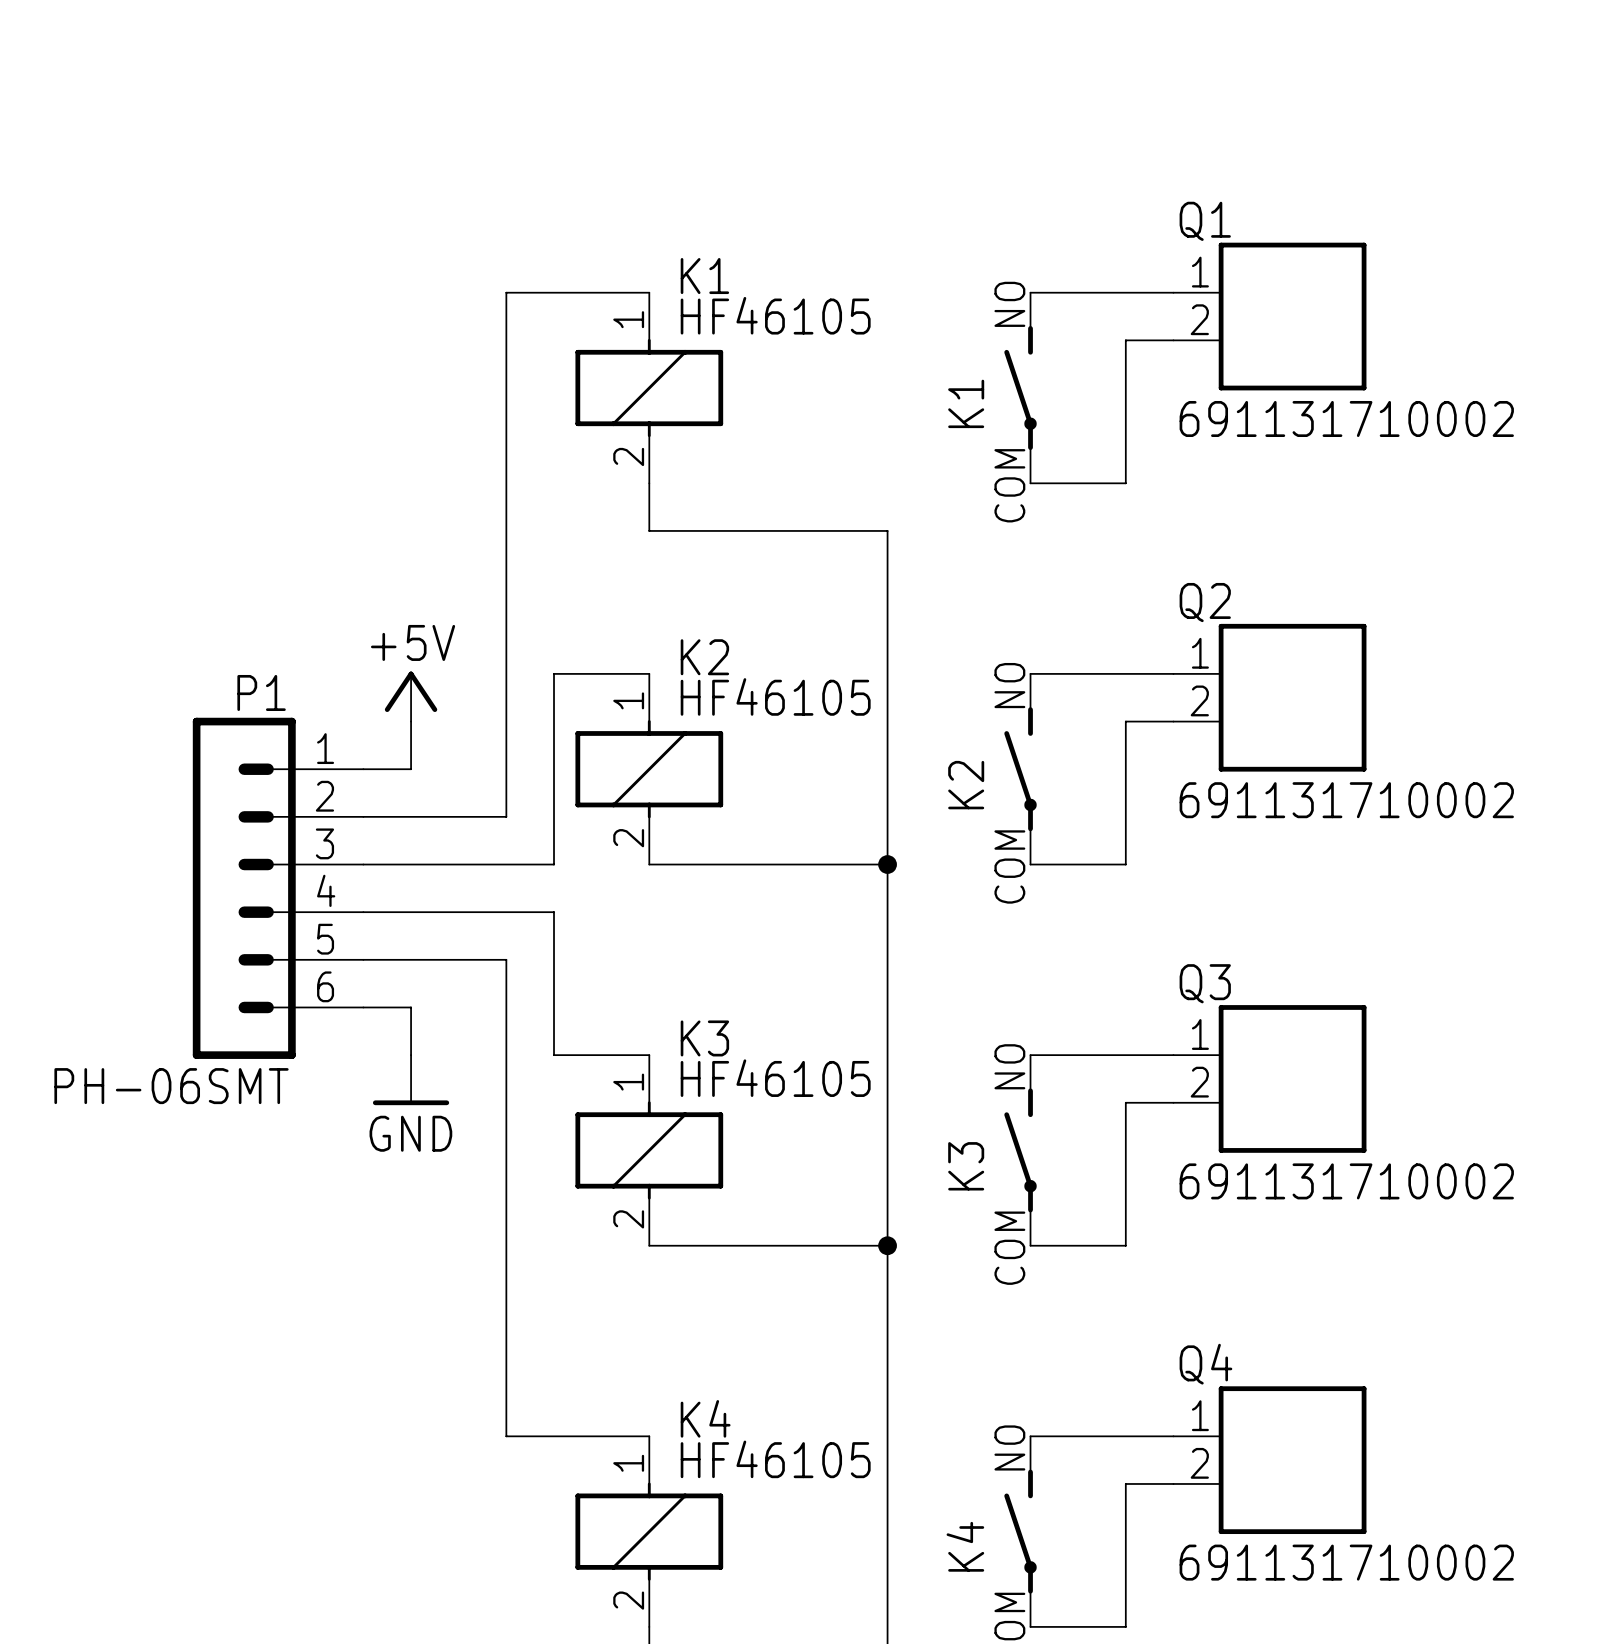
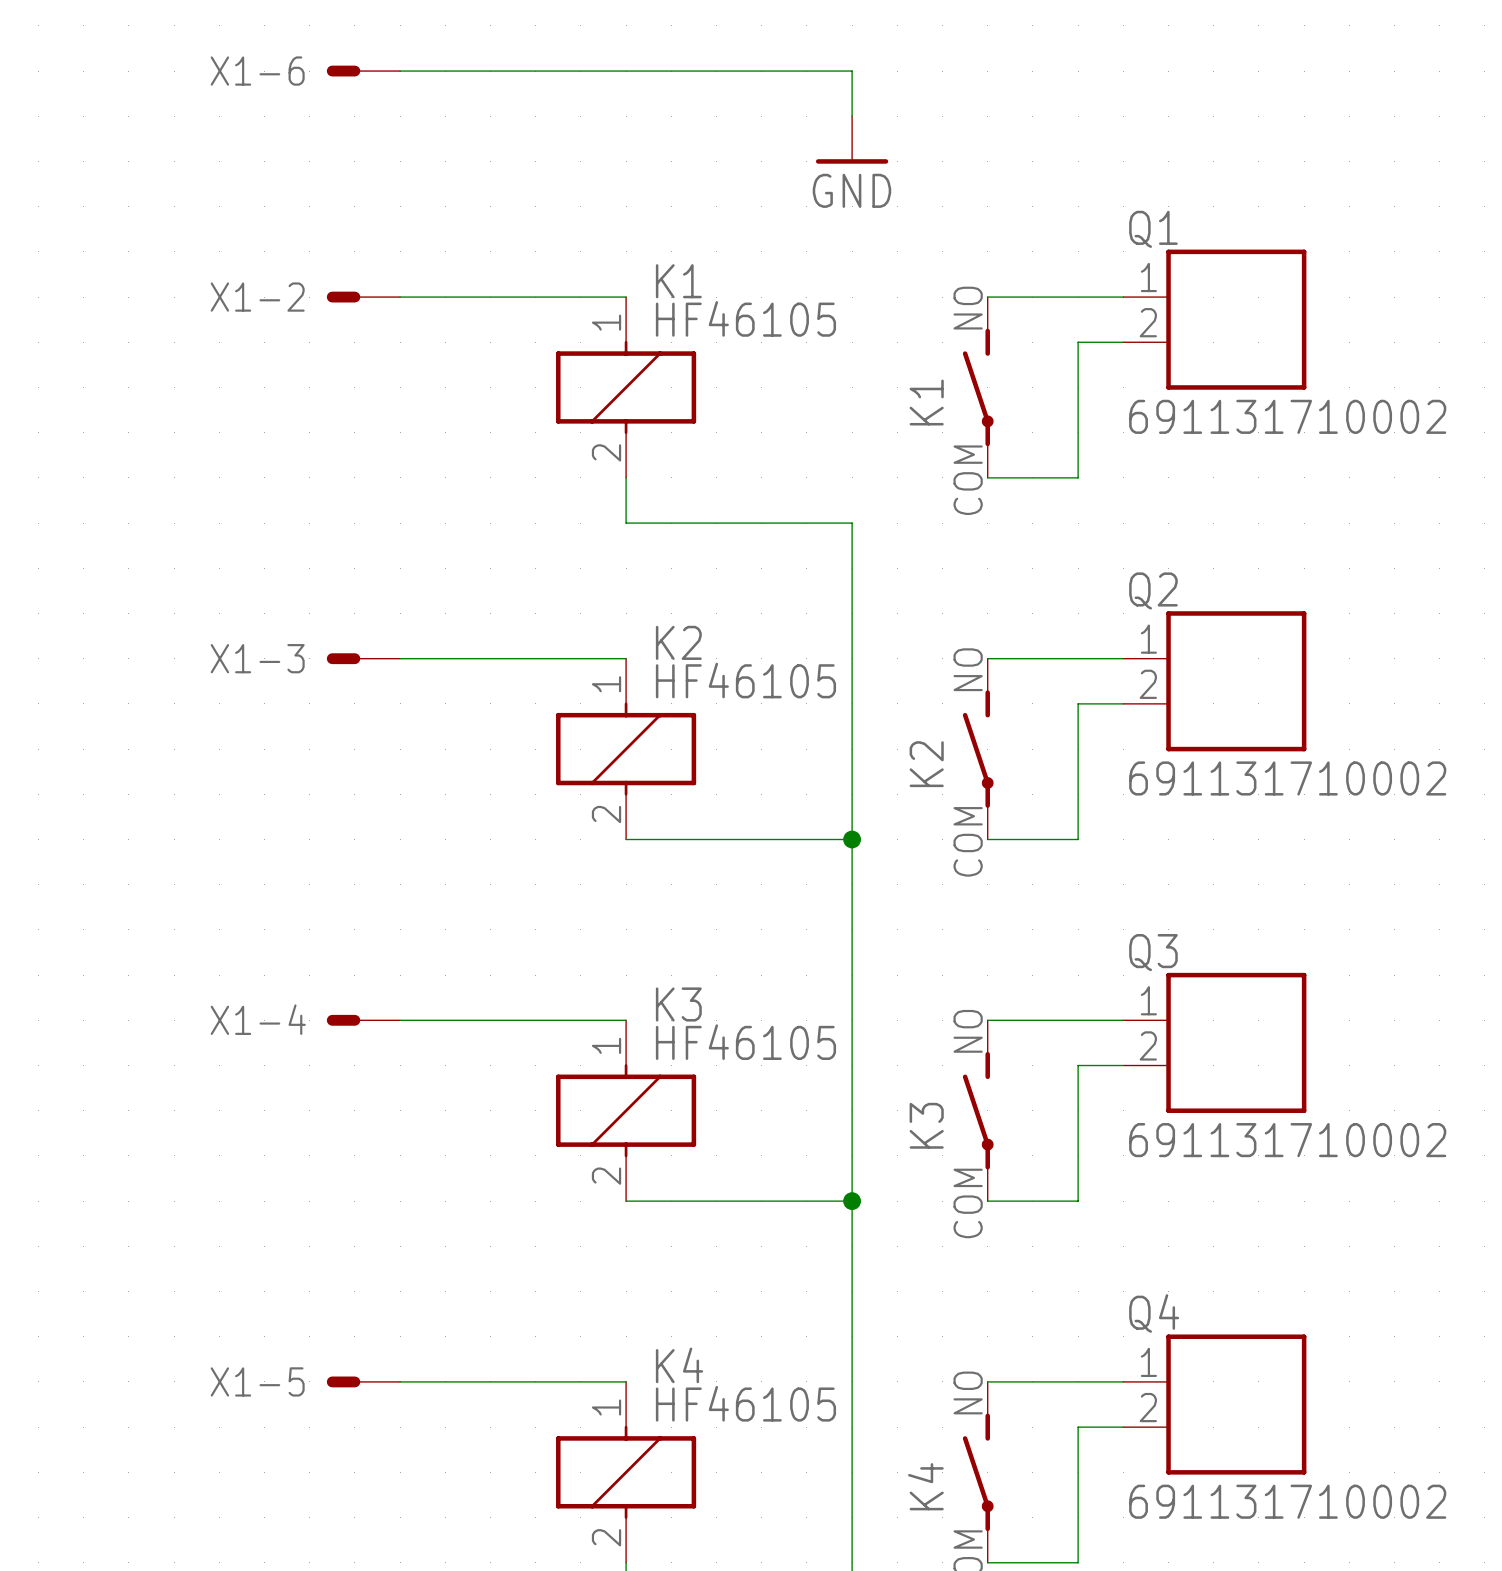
X1-6: none -> (363, 71)
wire: none -> (400, 71) (852, 71) (852, 116)
power symbol: none -> GND (852, 139)
X1-2: none -> (363, 297)
wire: (506, 292) (506, 816) (363, 816) -> (490, 297) (400, 297)
X1-3: none -> (363, 658)
wire: (554, 673) (554, 864) (363, 864) -> (535, 658) (400, 658)
power symbol: +5V (411, 696) -> none
wire: (411, 721) (411, 769) (363, 769) -> none
P1: PH-06SMT (278, 888) -> none
wire: (363, 912) (554, 912) (554, 1055) -> (400, 1020) (535, 1020)
wire: (363, 959) (506, 959) (506, 1436) -> (400, 1381) (490, 1381)
wire: (363, 1007) (411, 1007) (411, 1055) -> none
X1-4: none -> (363, 1020)
power symbol: GND (411, 1080) -> none
X1-5: none -> (363, 1381)

